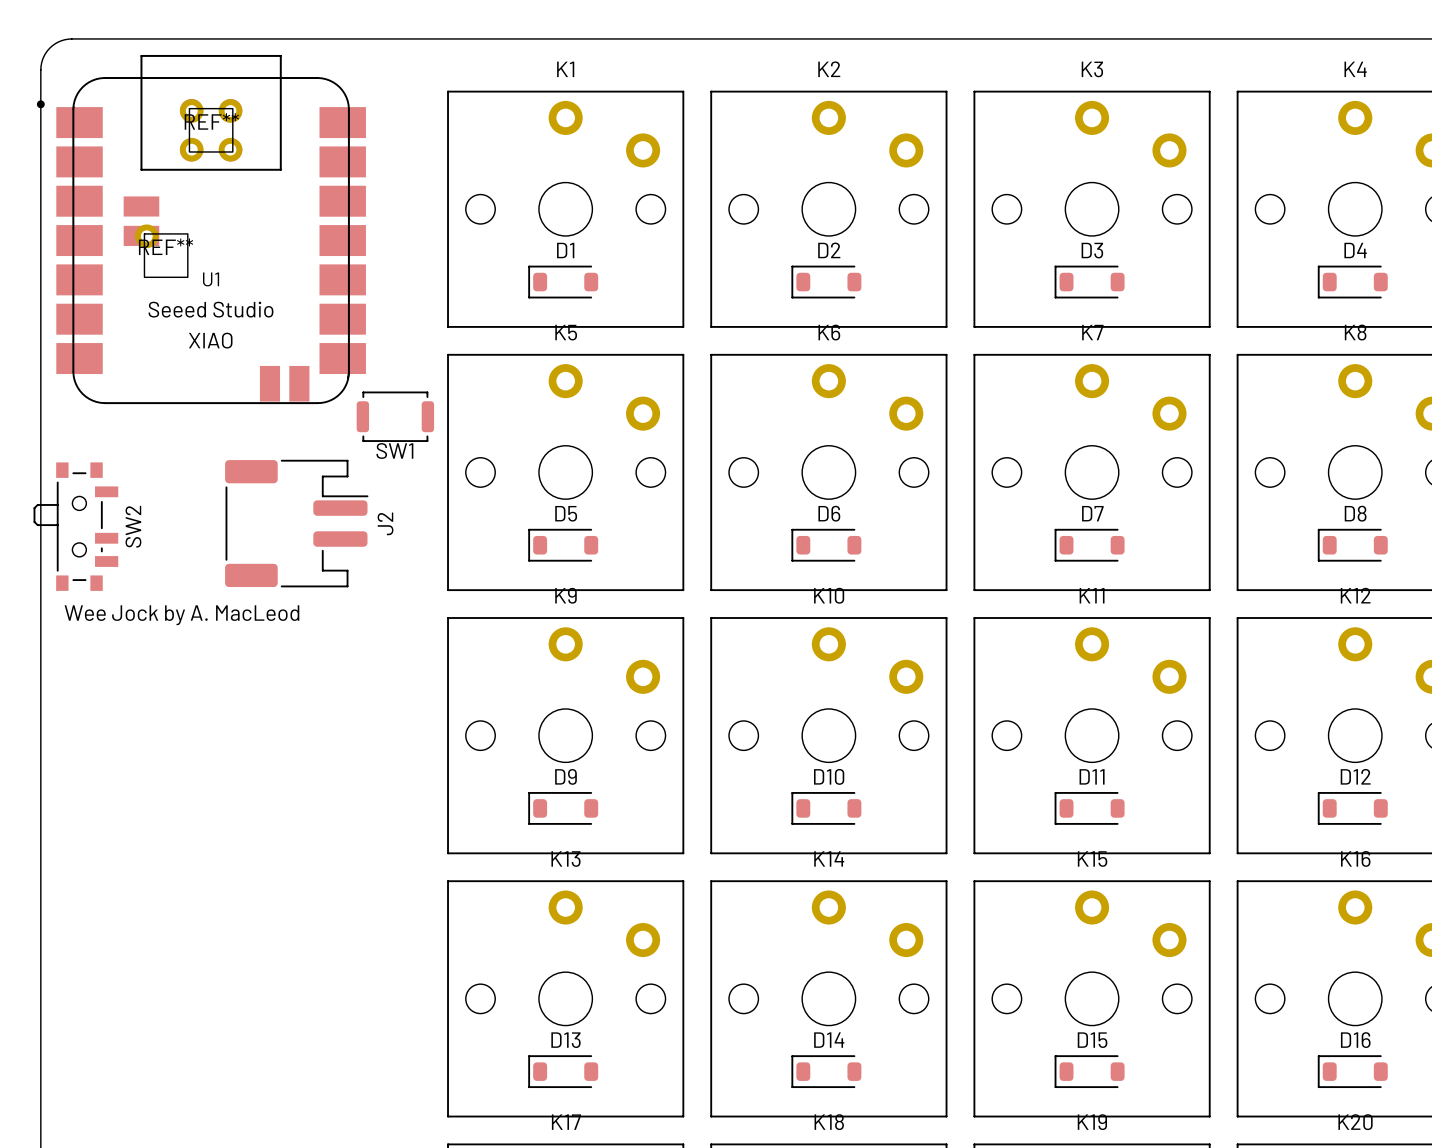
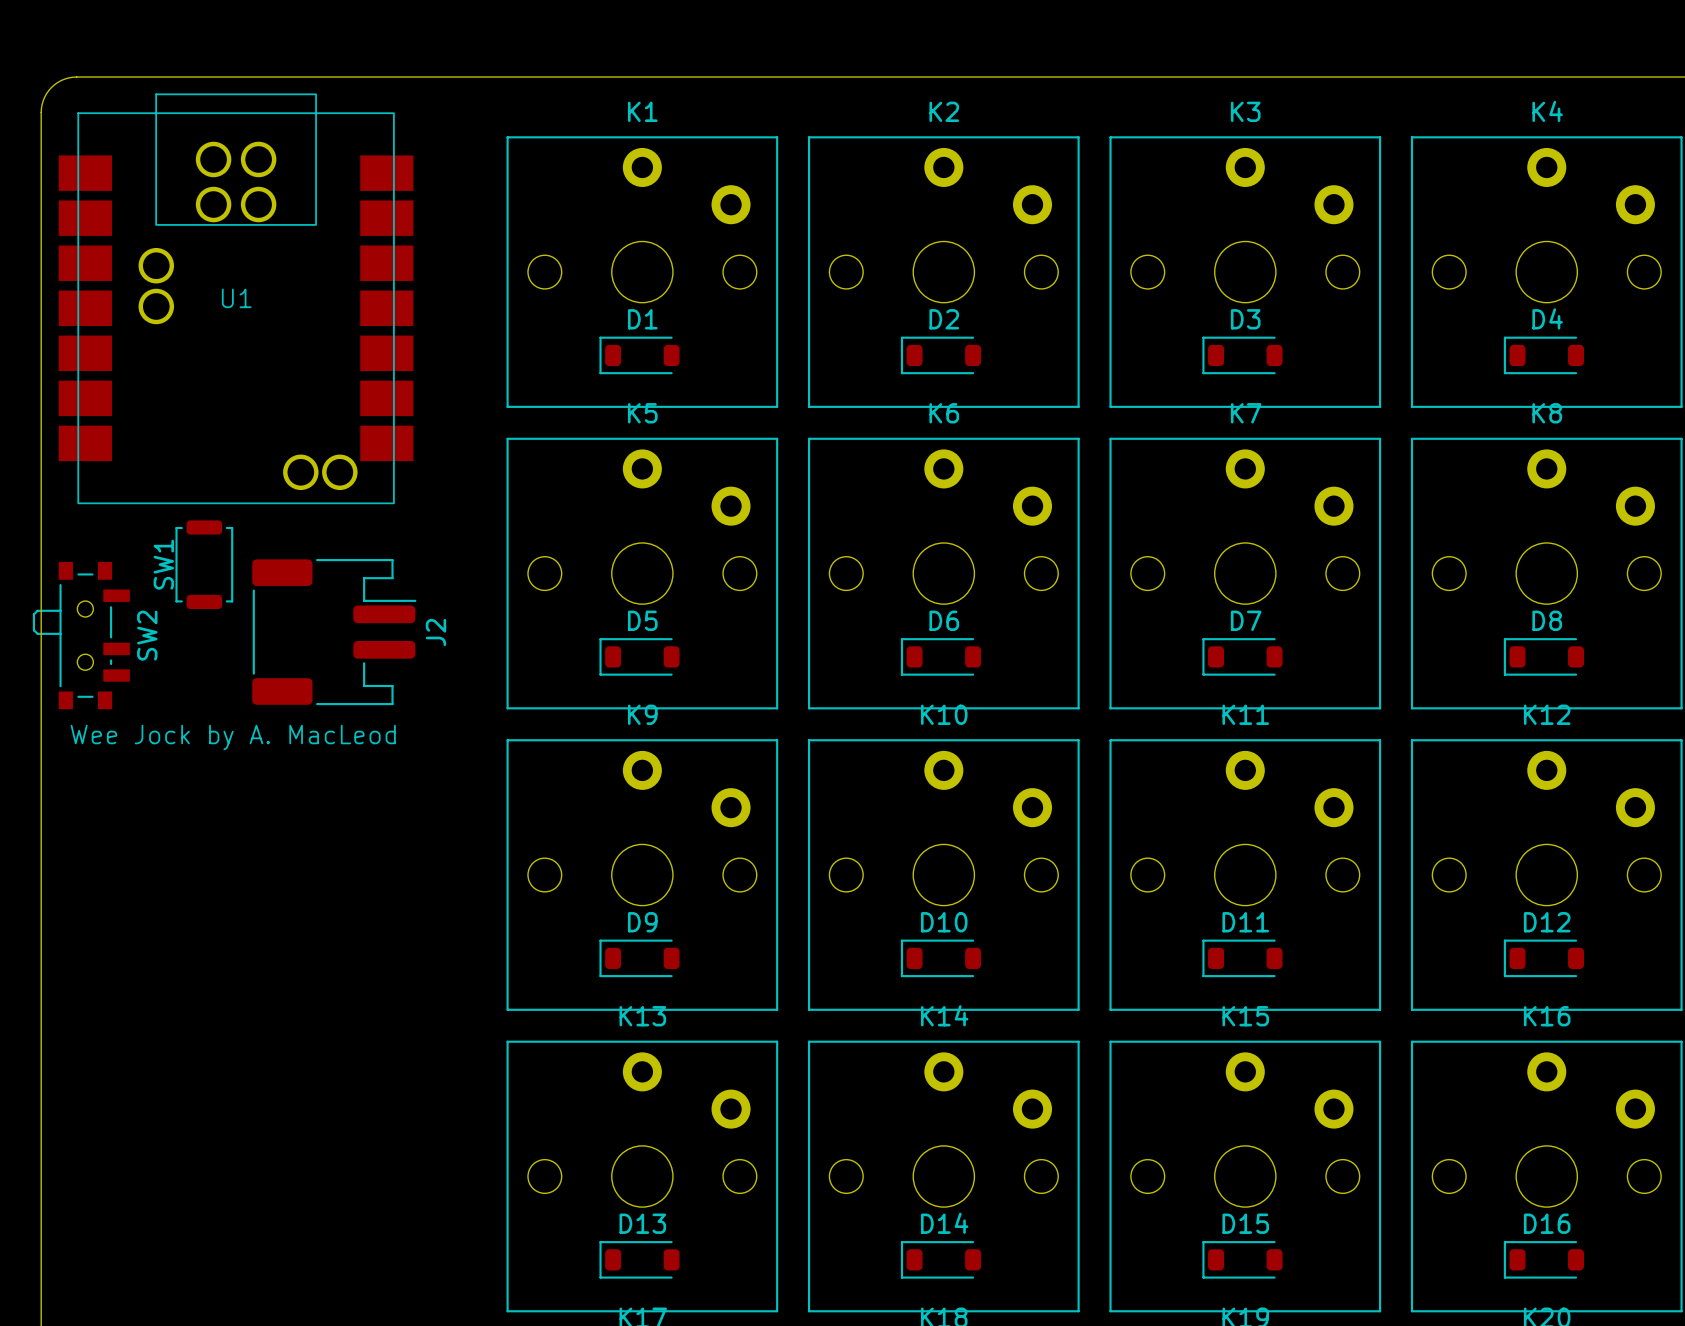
U1 footprint: [36, 54, 366, 405] -> [58, 93, 414, 505]
REF**: (211, 130) -> none
REF**: (161, 251) -> none
U1 name position: U1 (211, 279) -> U1 (236, 298)
SW1 rotation: 0° (395, 416) -> 90° clockwise (204, 564)
SW1 position: (395, 416) -> (204, 564)

